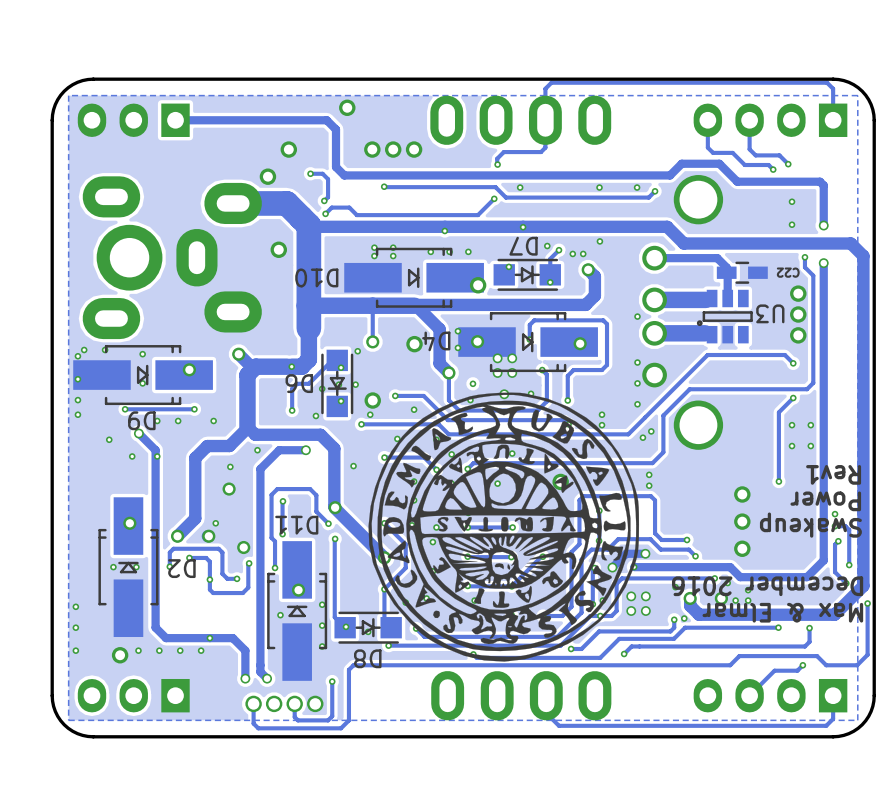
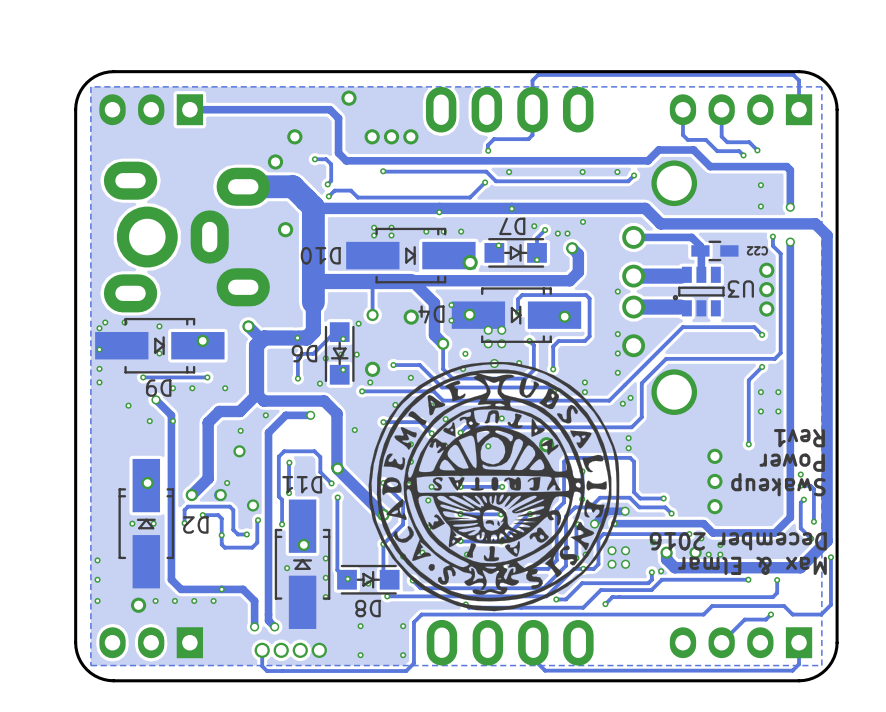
track: (425, 665) (353, 665) (348, 669) (348, 720) (341, 728) (258, 728) (253, 721) -> (421, 614) (413, 622) (413, 663) (406, 671) (266, 671) (262, 666)
part: none -> (360, 626)
part: none -> (403, 626)
track: (332, 681) (332, 716) (328, 720) (298, 720) (294, 717) (294, 703) -> none
via: (332, 681) -> none
part: none -> (360, 655)
part: none -> (403, 655)

